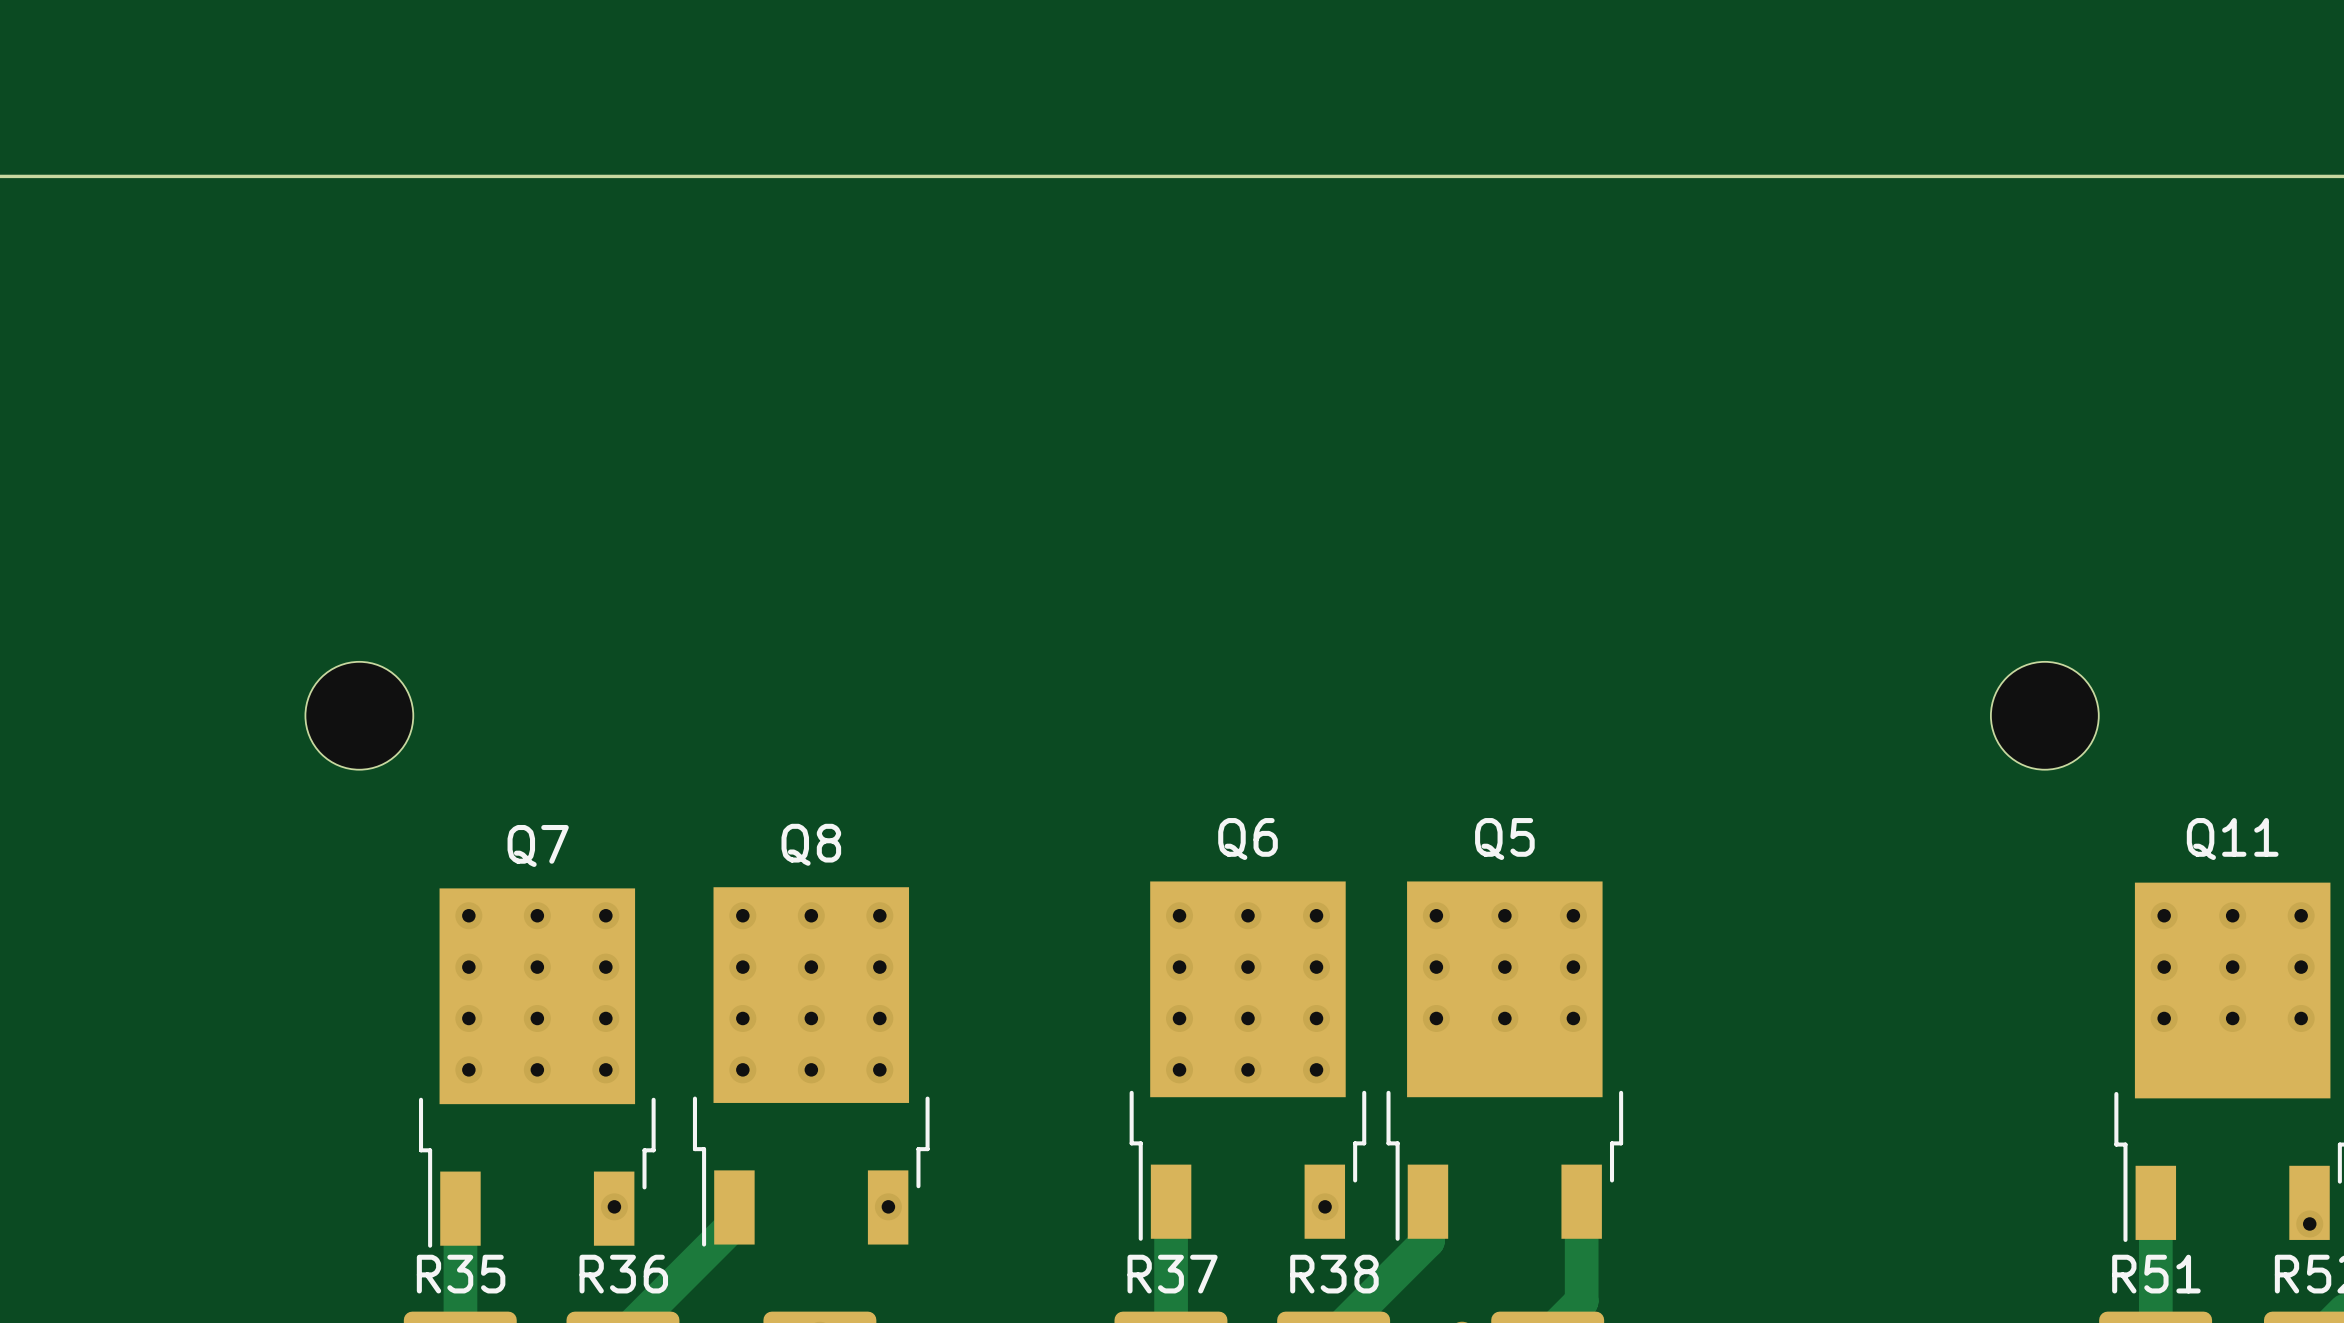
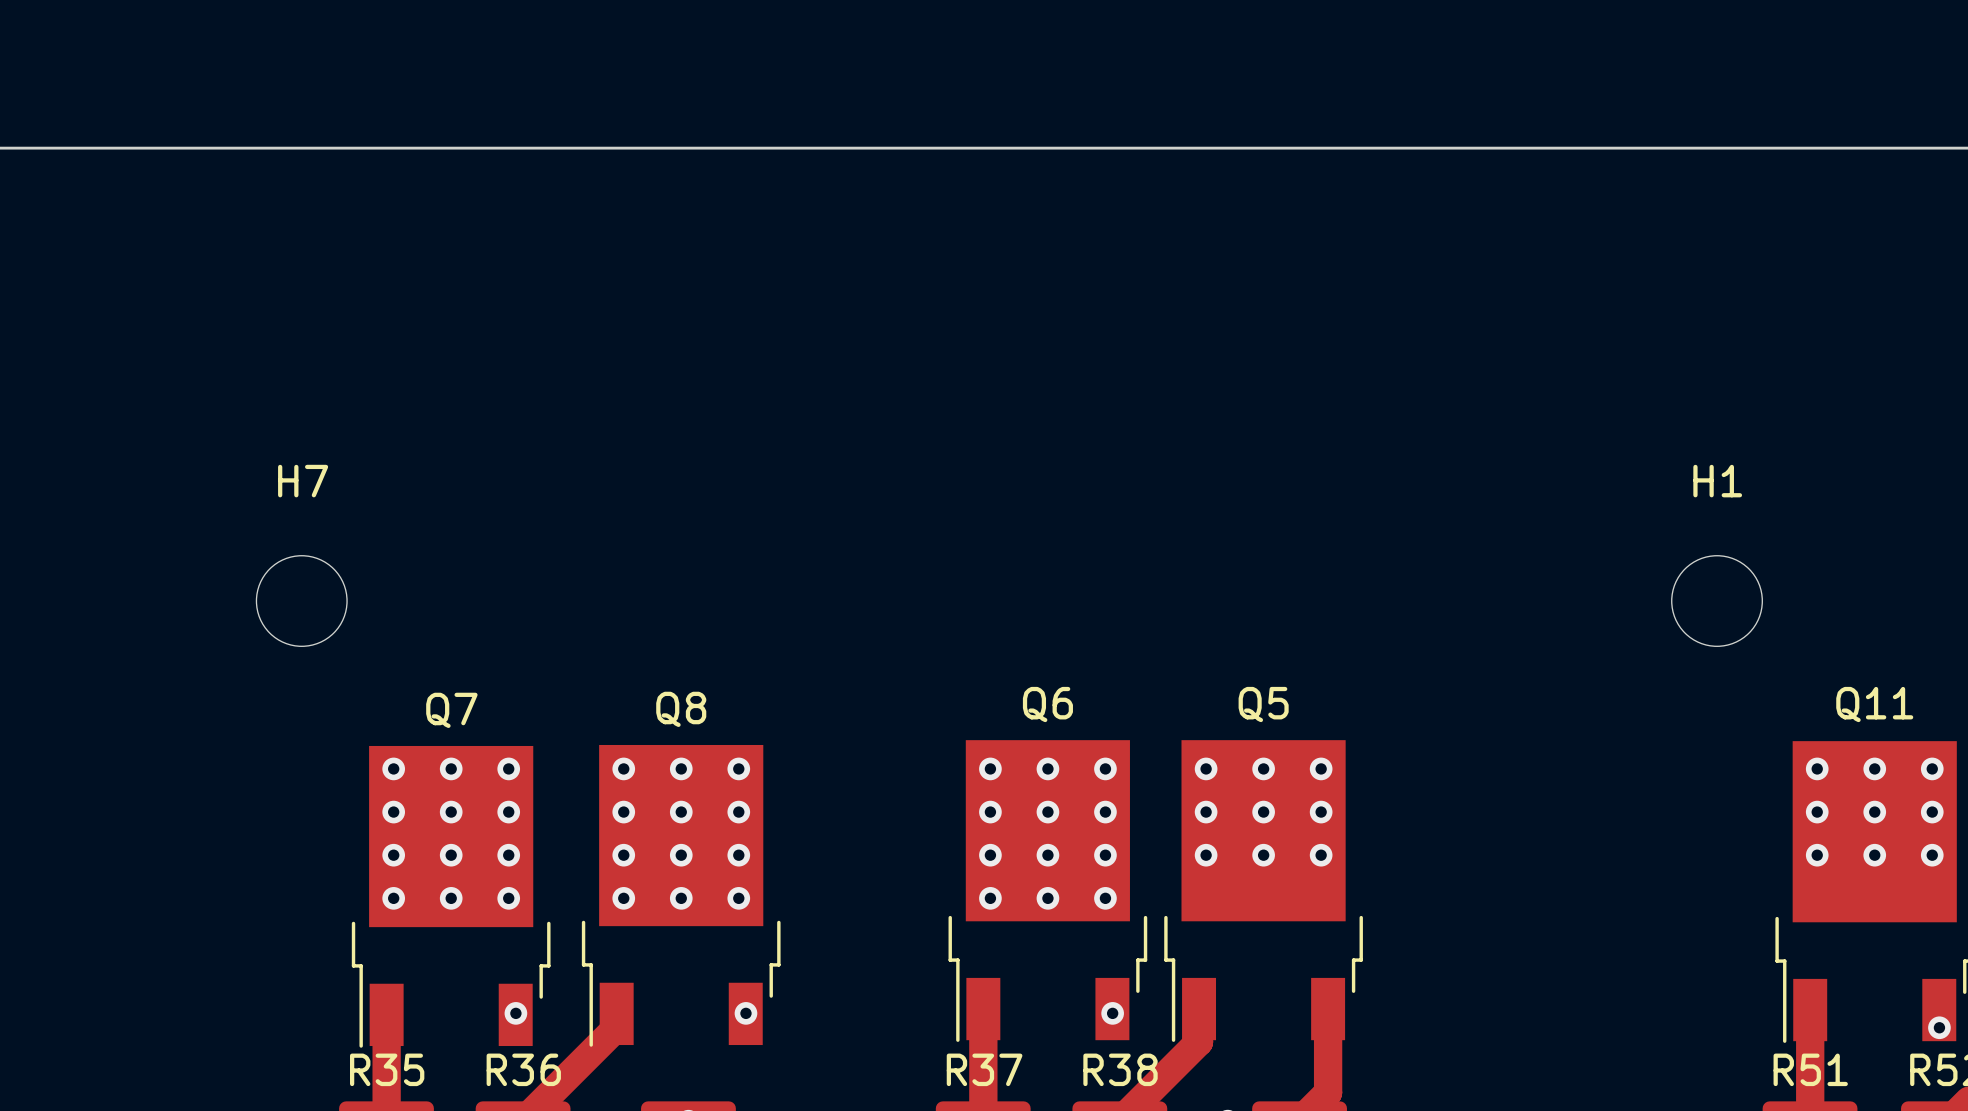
H7 name: none -> H7 (303, 481)
H1 name: none -> H1 (1717, 481)

